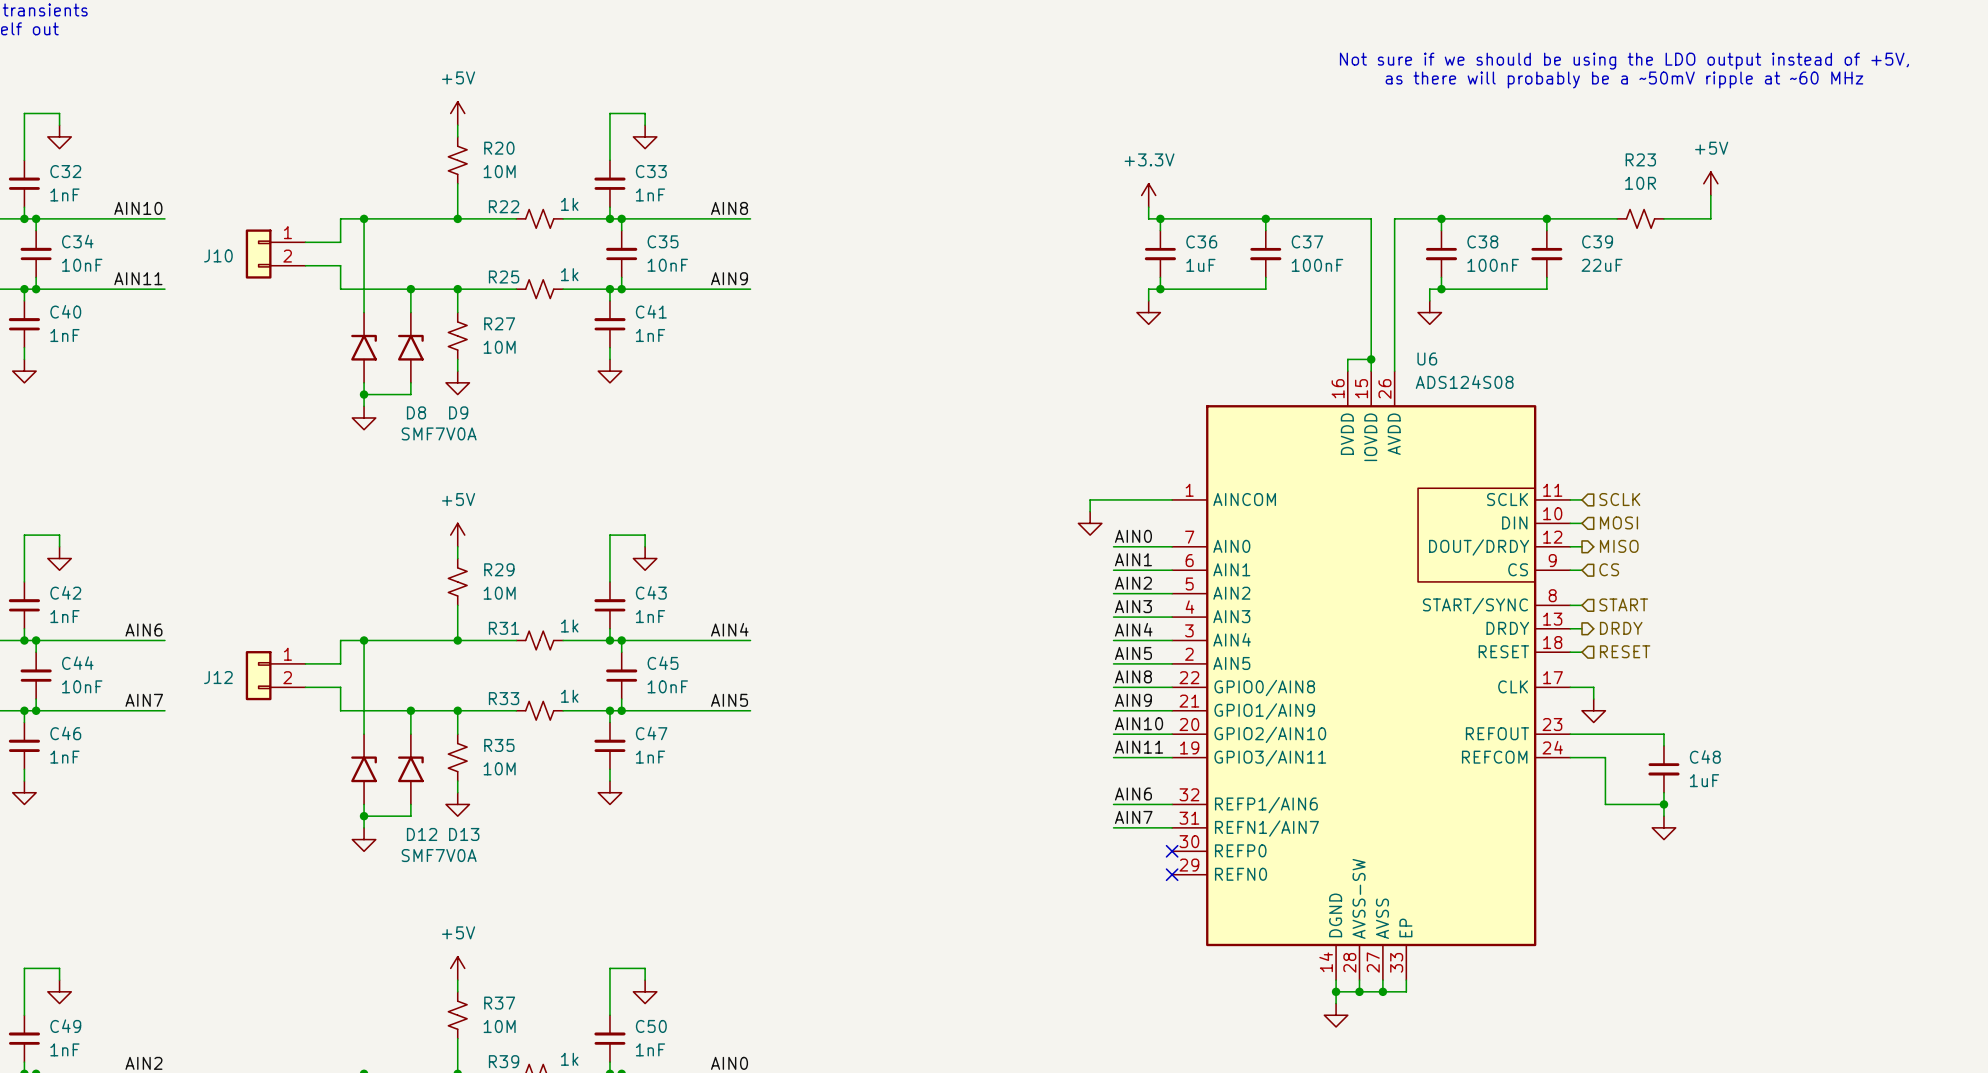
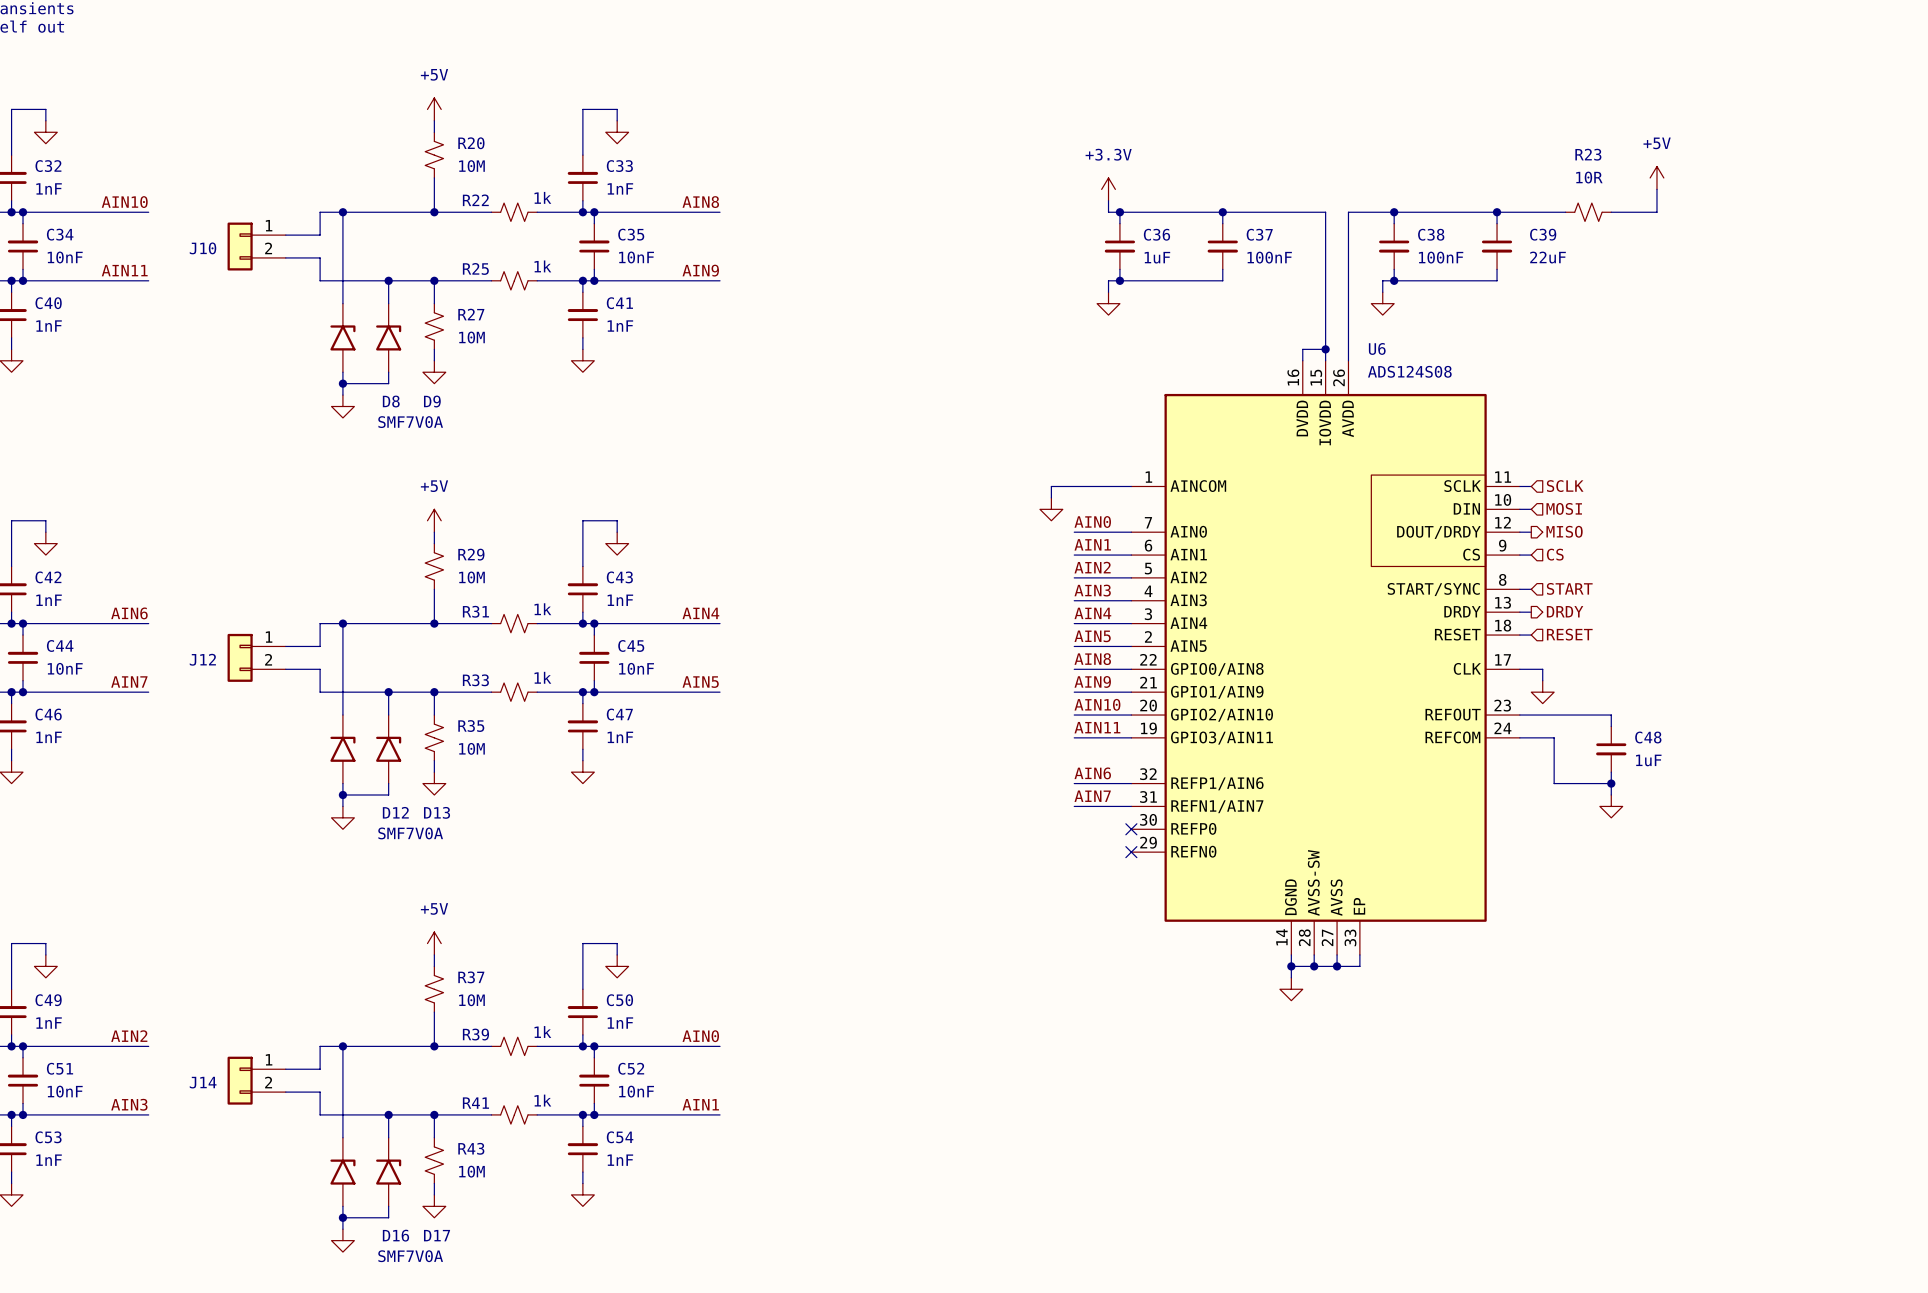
text: Not sure if we should be using the LDO output instead of +5V, (1624, 61) -> none
text: as there will probably be a ~50mV ripple at ~60 MHz (1624, 79) -> none

